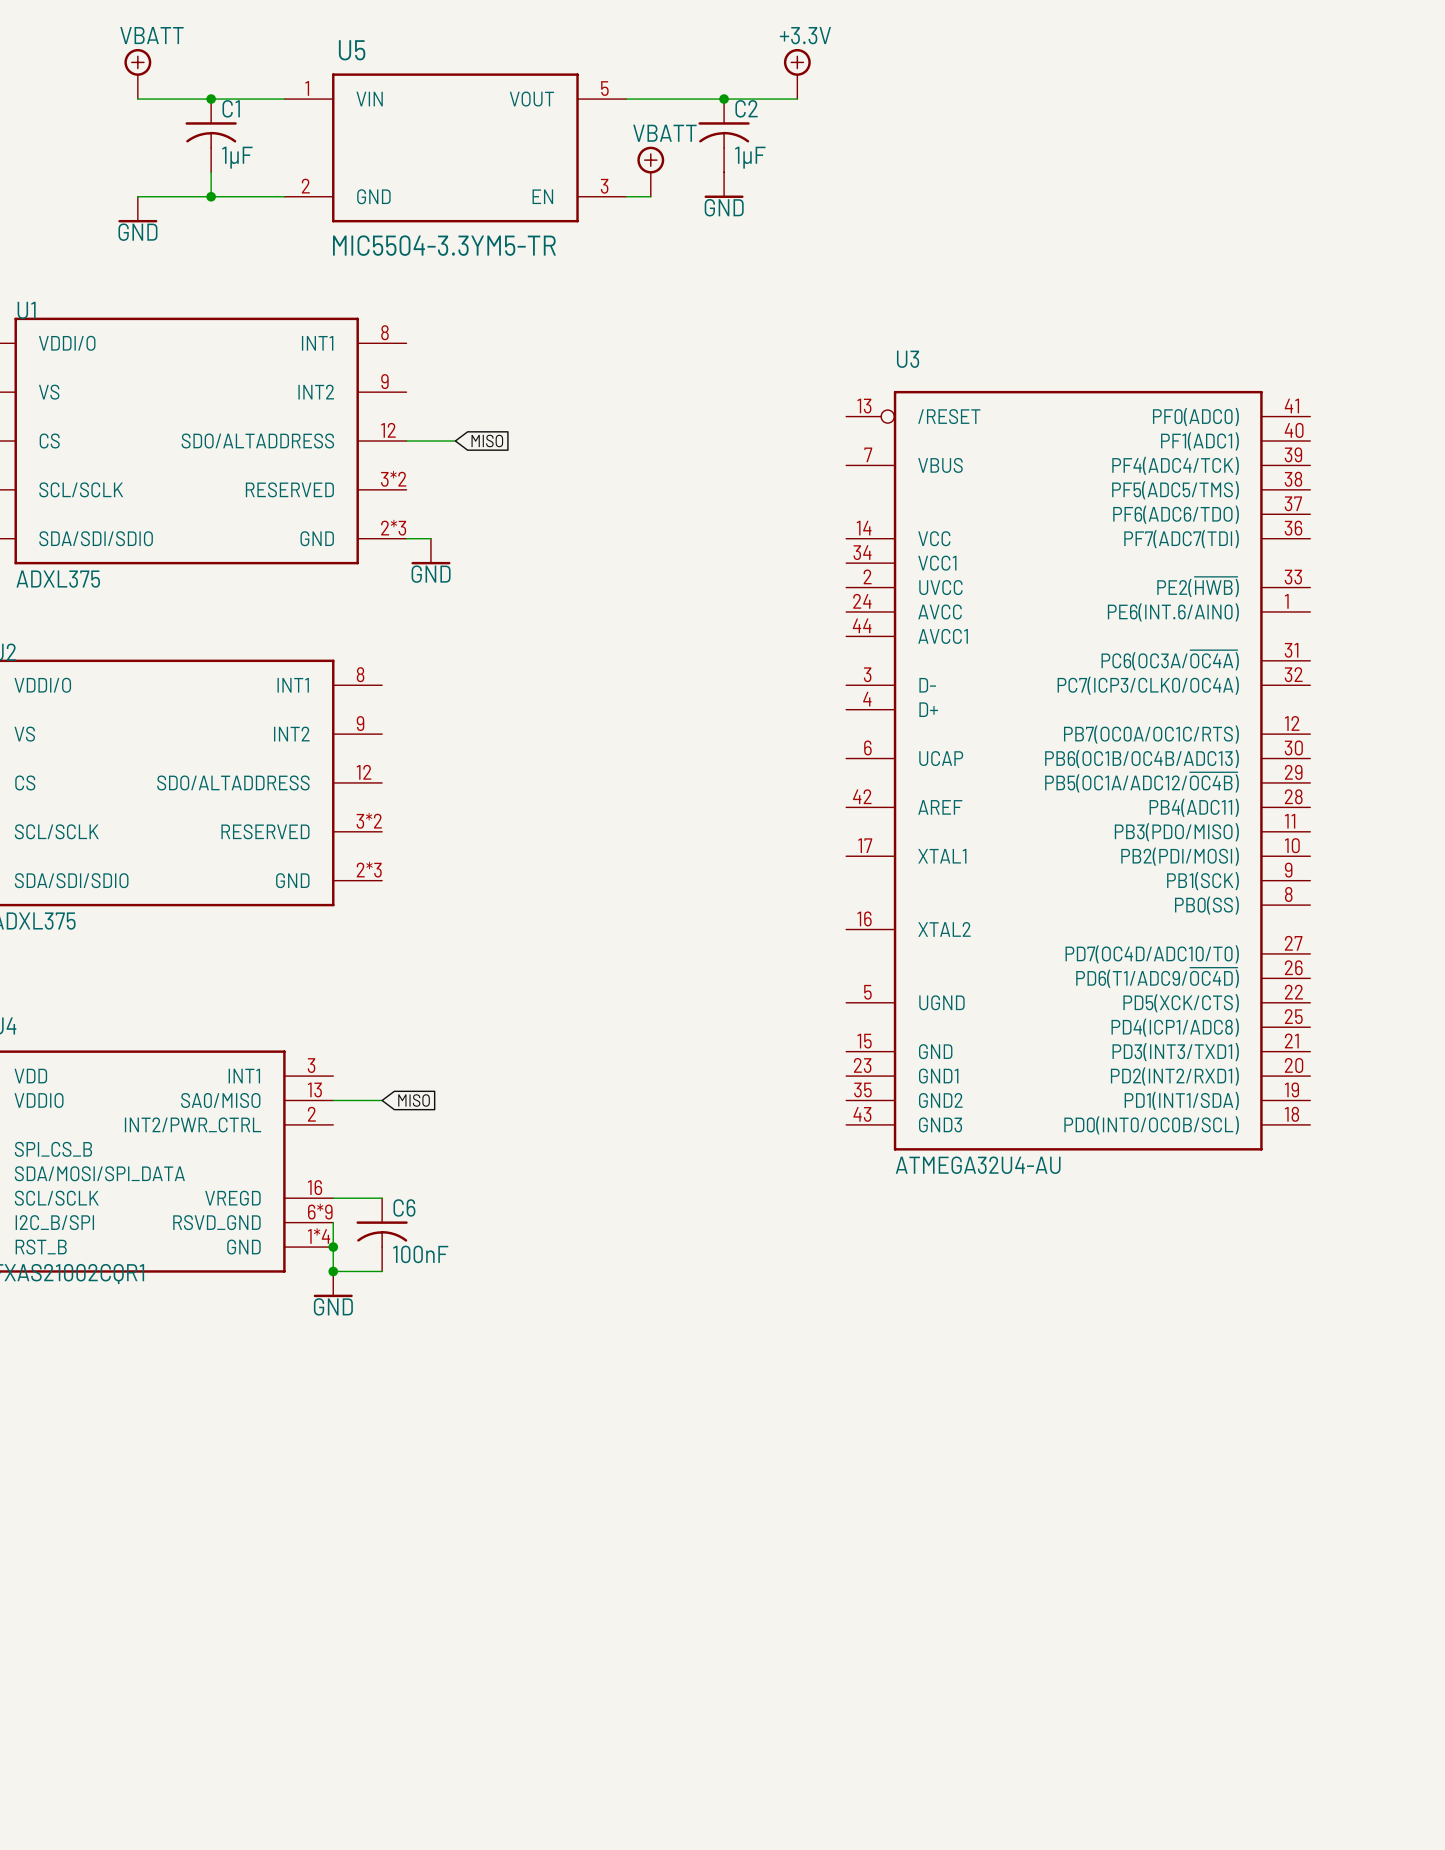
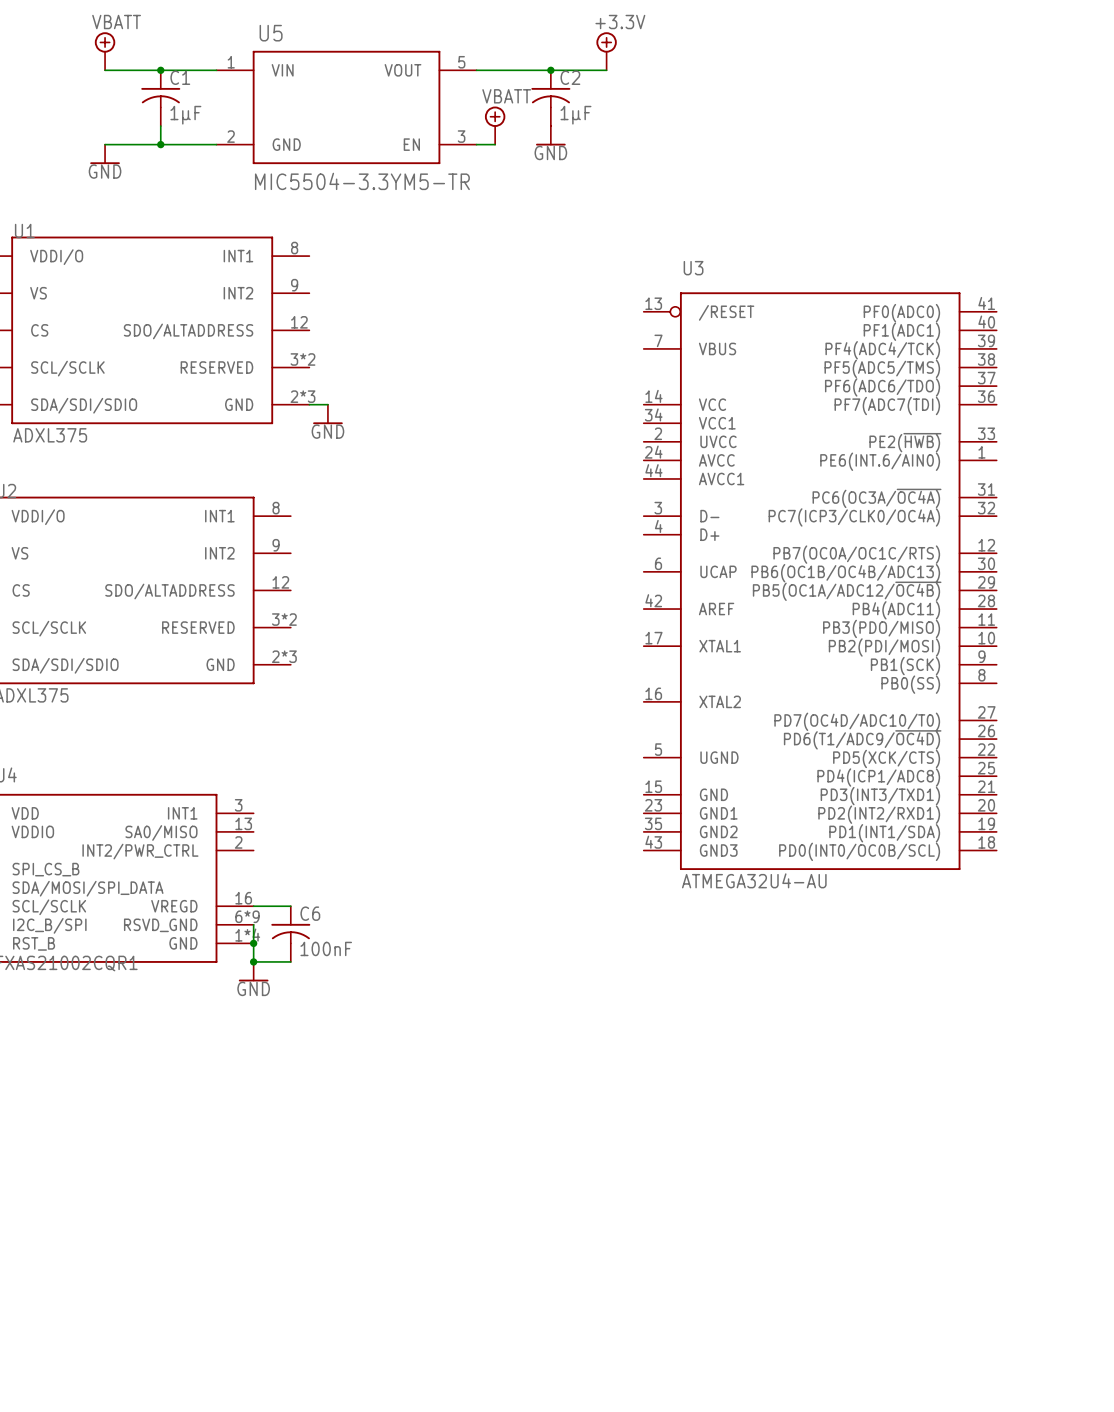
wire: (406, 441) (455, 441) -> none
global label: MISO (487, 441) -> none
wire: (333, 1100) (382, 1100) -> none
global label: MISO (414, 1100) -> none

